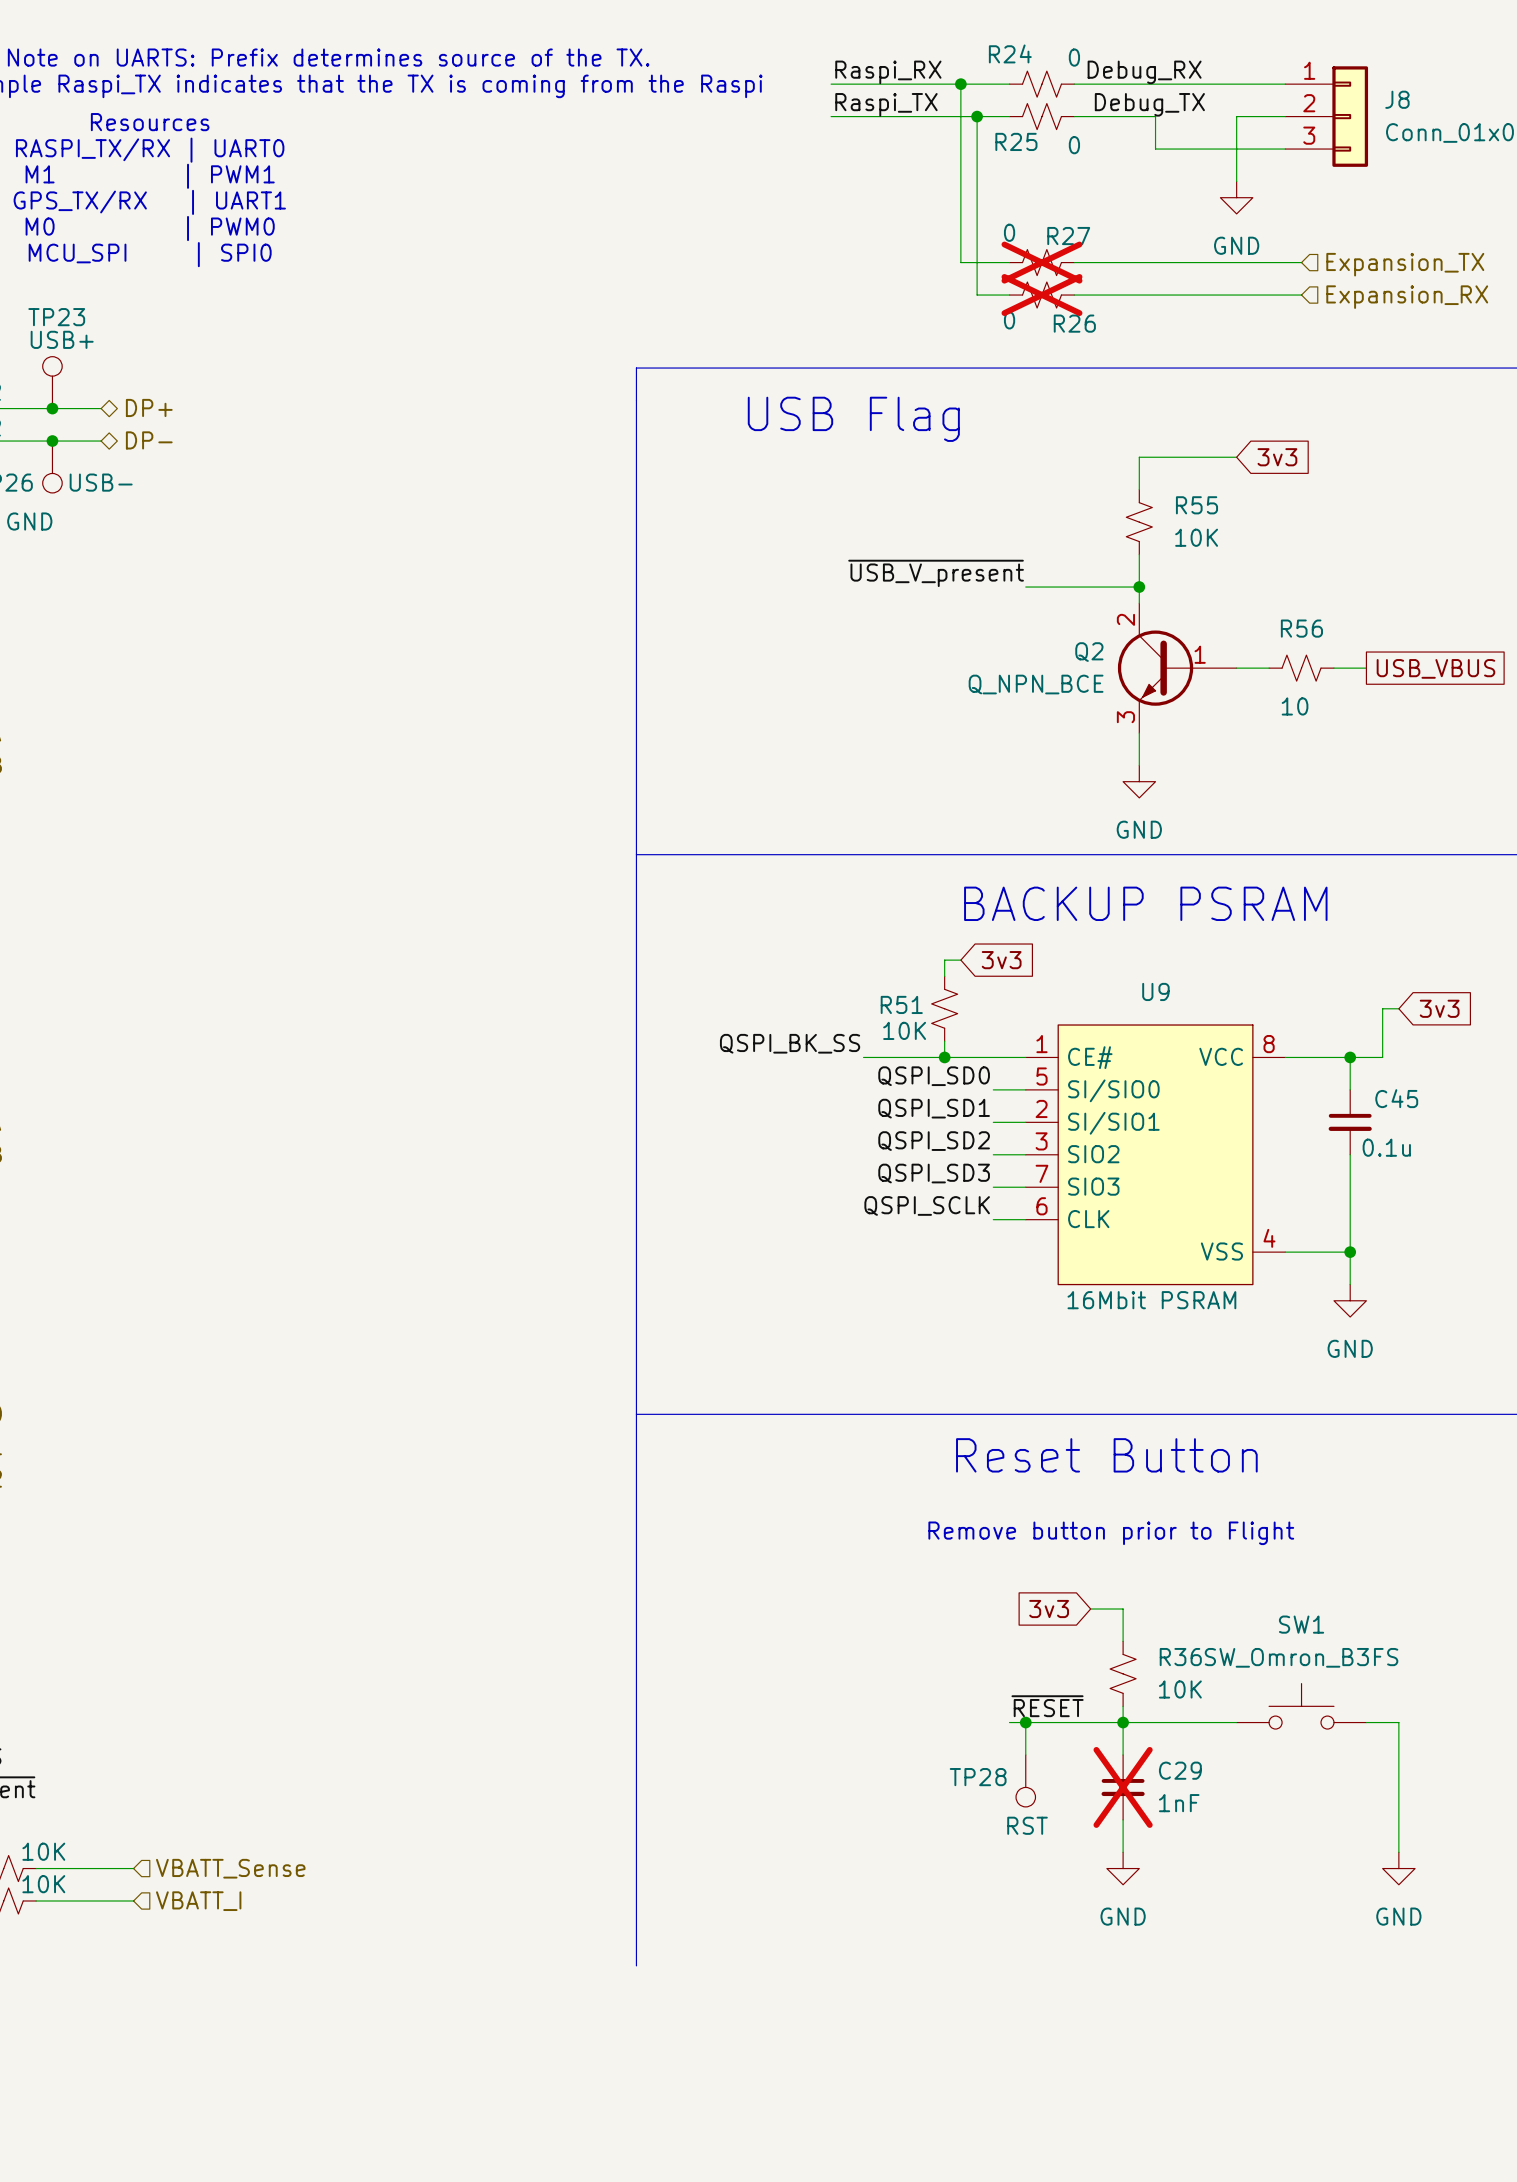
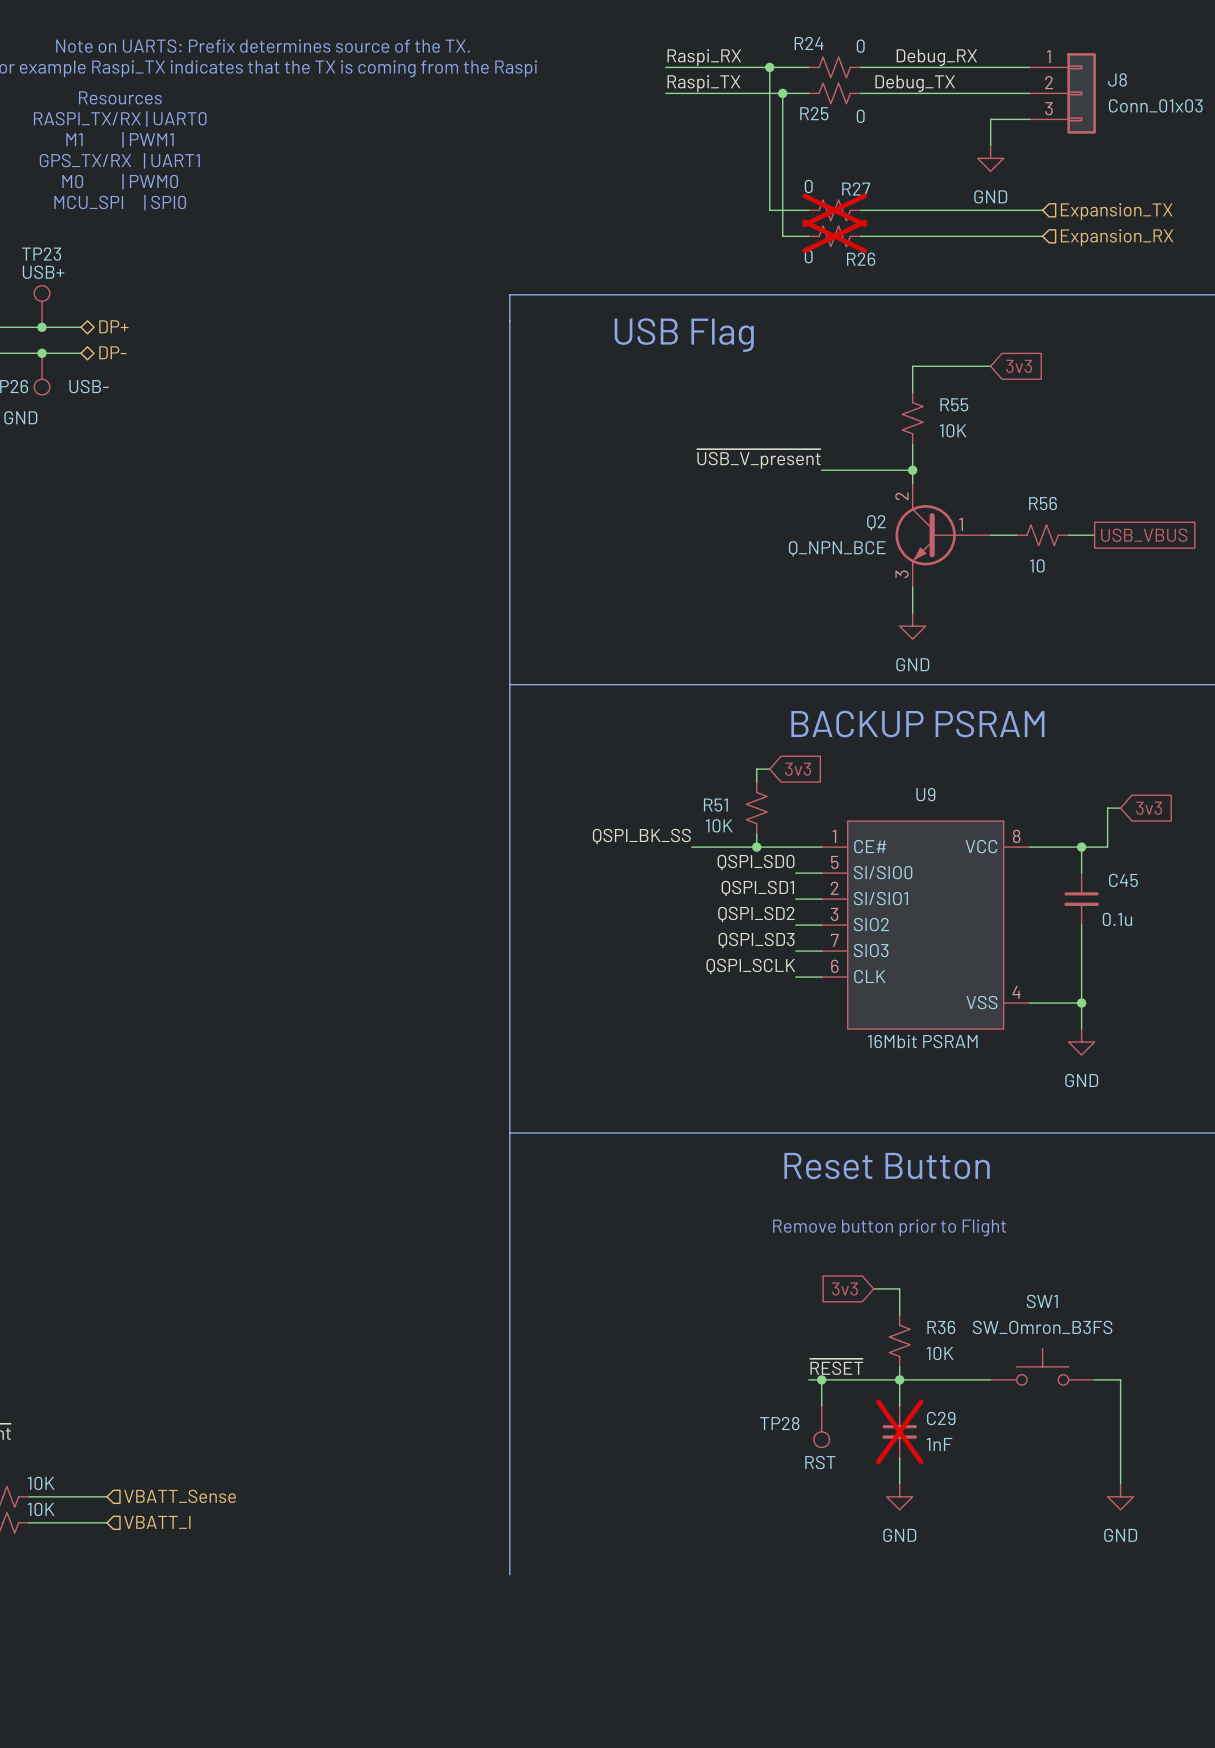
label position: Debug_RX (1144, 72) -> Debug_RX (936, 57)
wire: (1155, 116) (1155, 149) (1236, 149) (1236, 116) -> (925, 93) (990, 93)

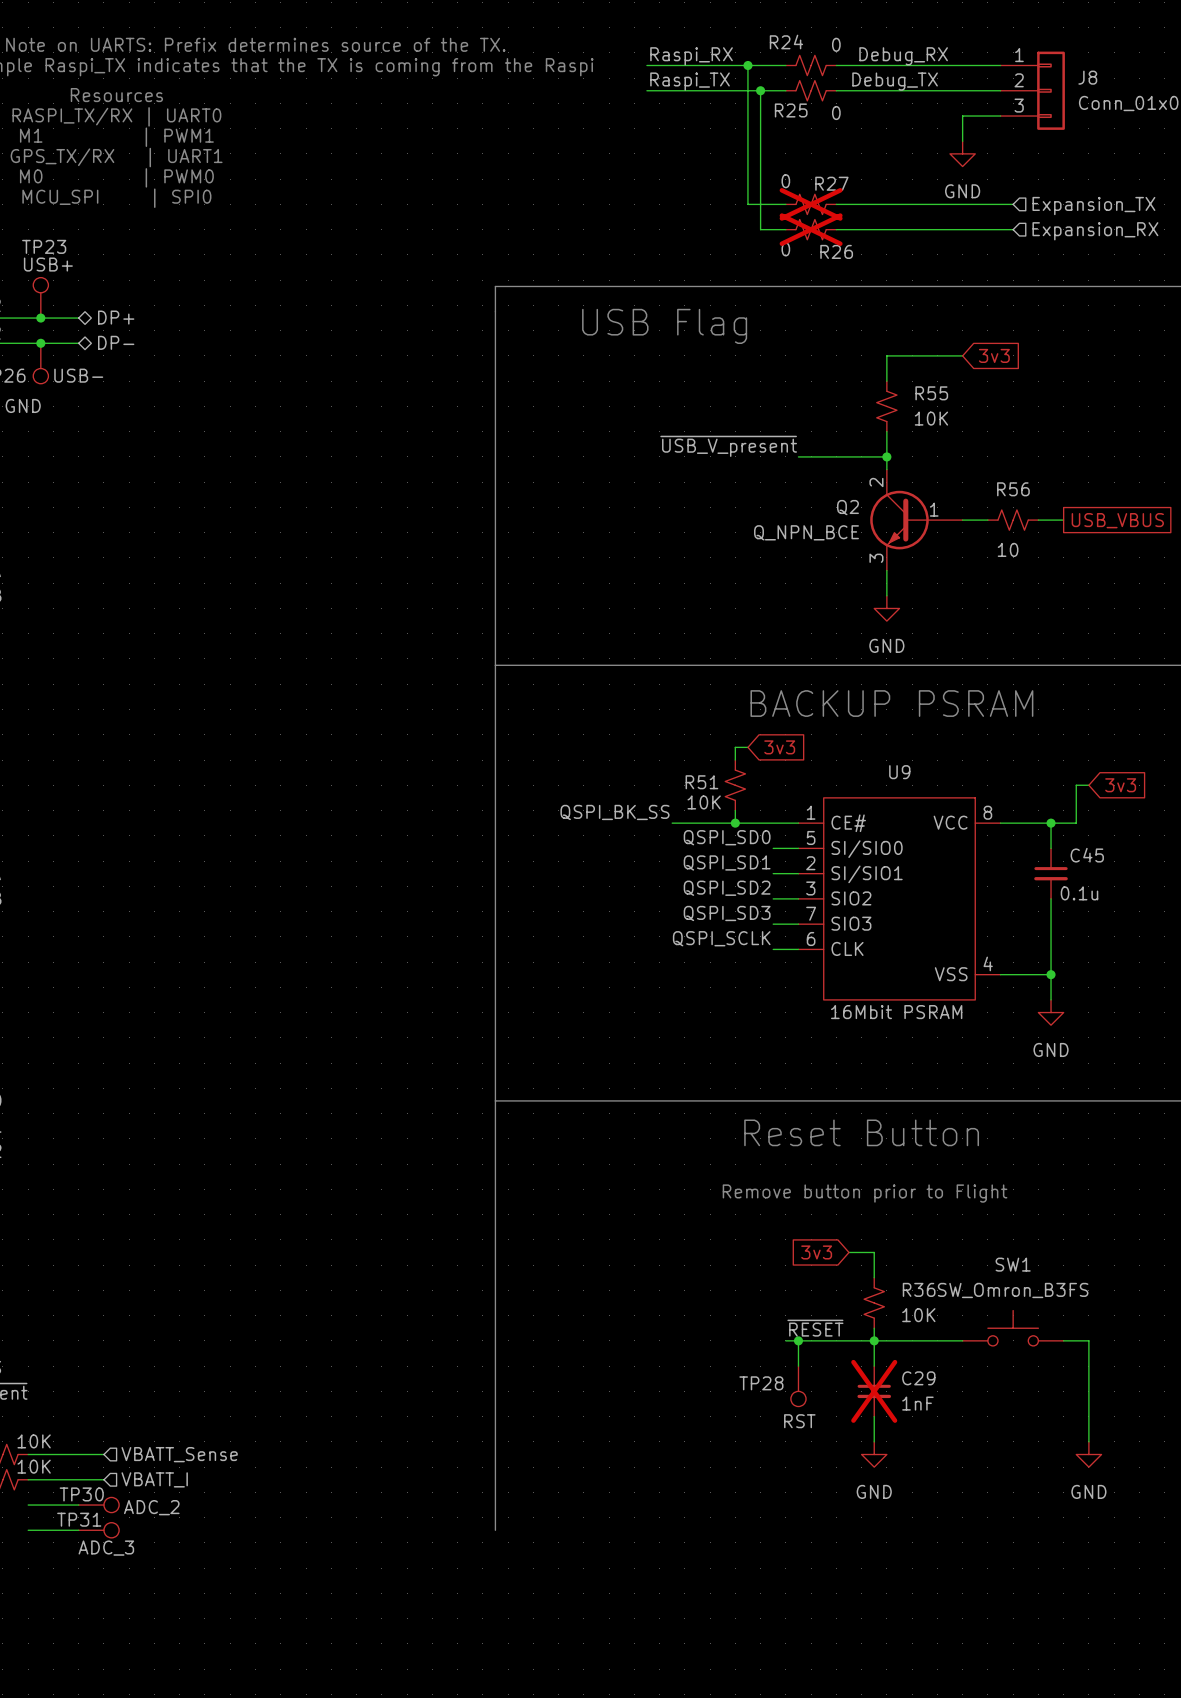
wire: none -> (28, 1505) (78, 1505)
TP30: none -> ADC_2 (98, 1505)
wire: none -> (28, 1530) (78, 1530)
TP31: none -> ADC_3 (98, 1530)

